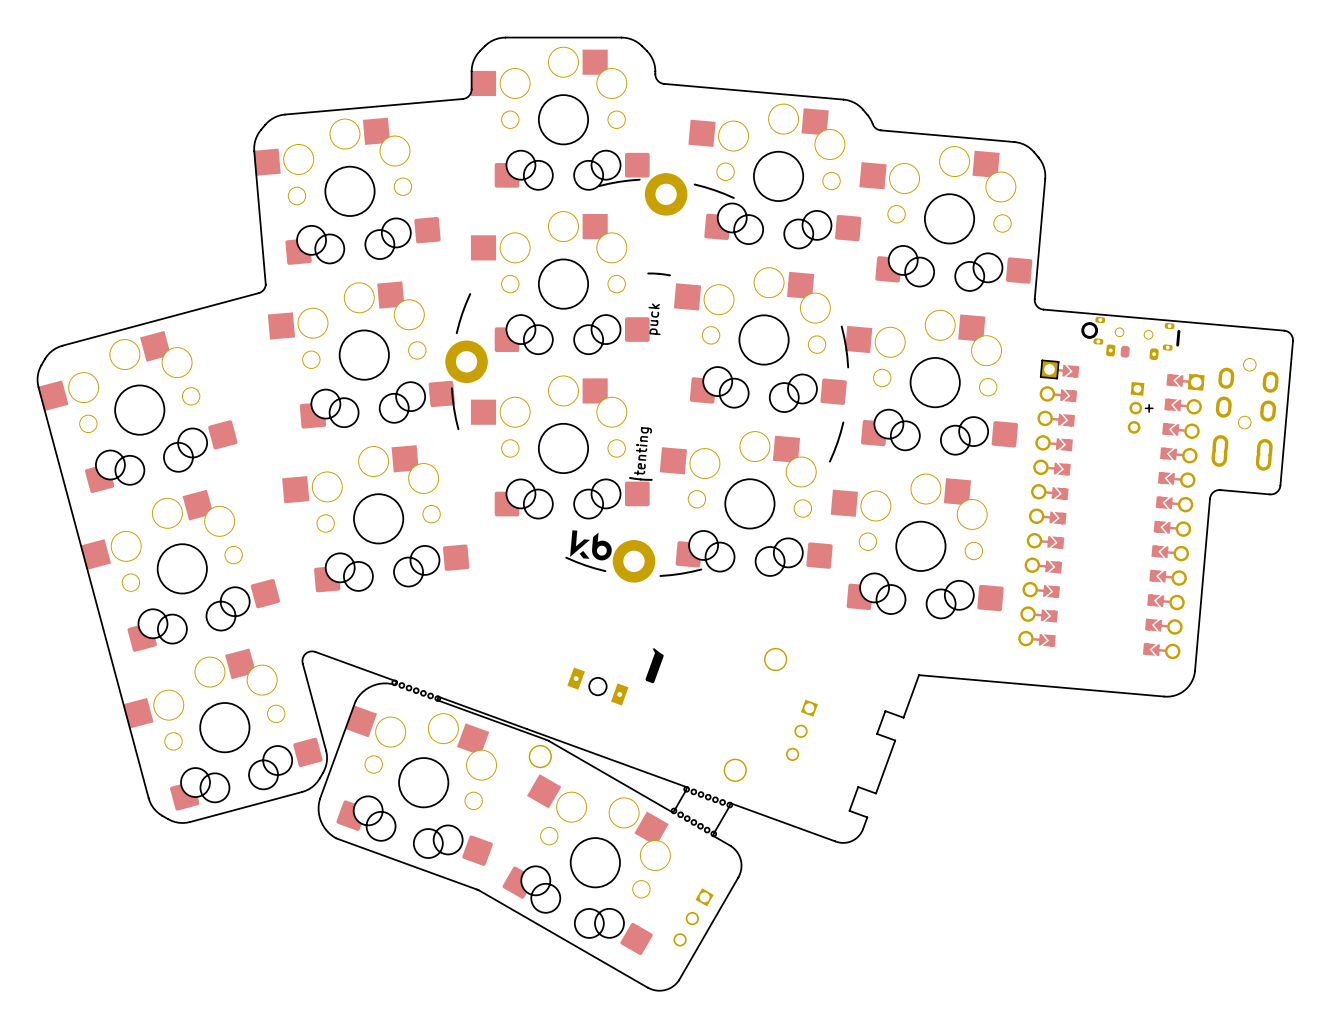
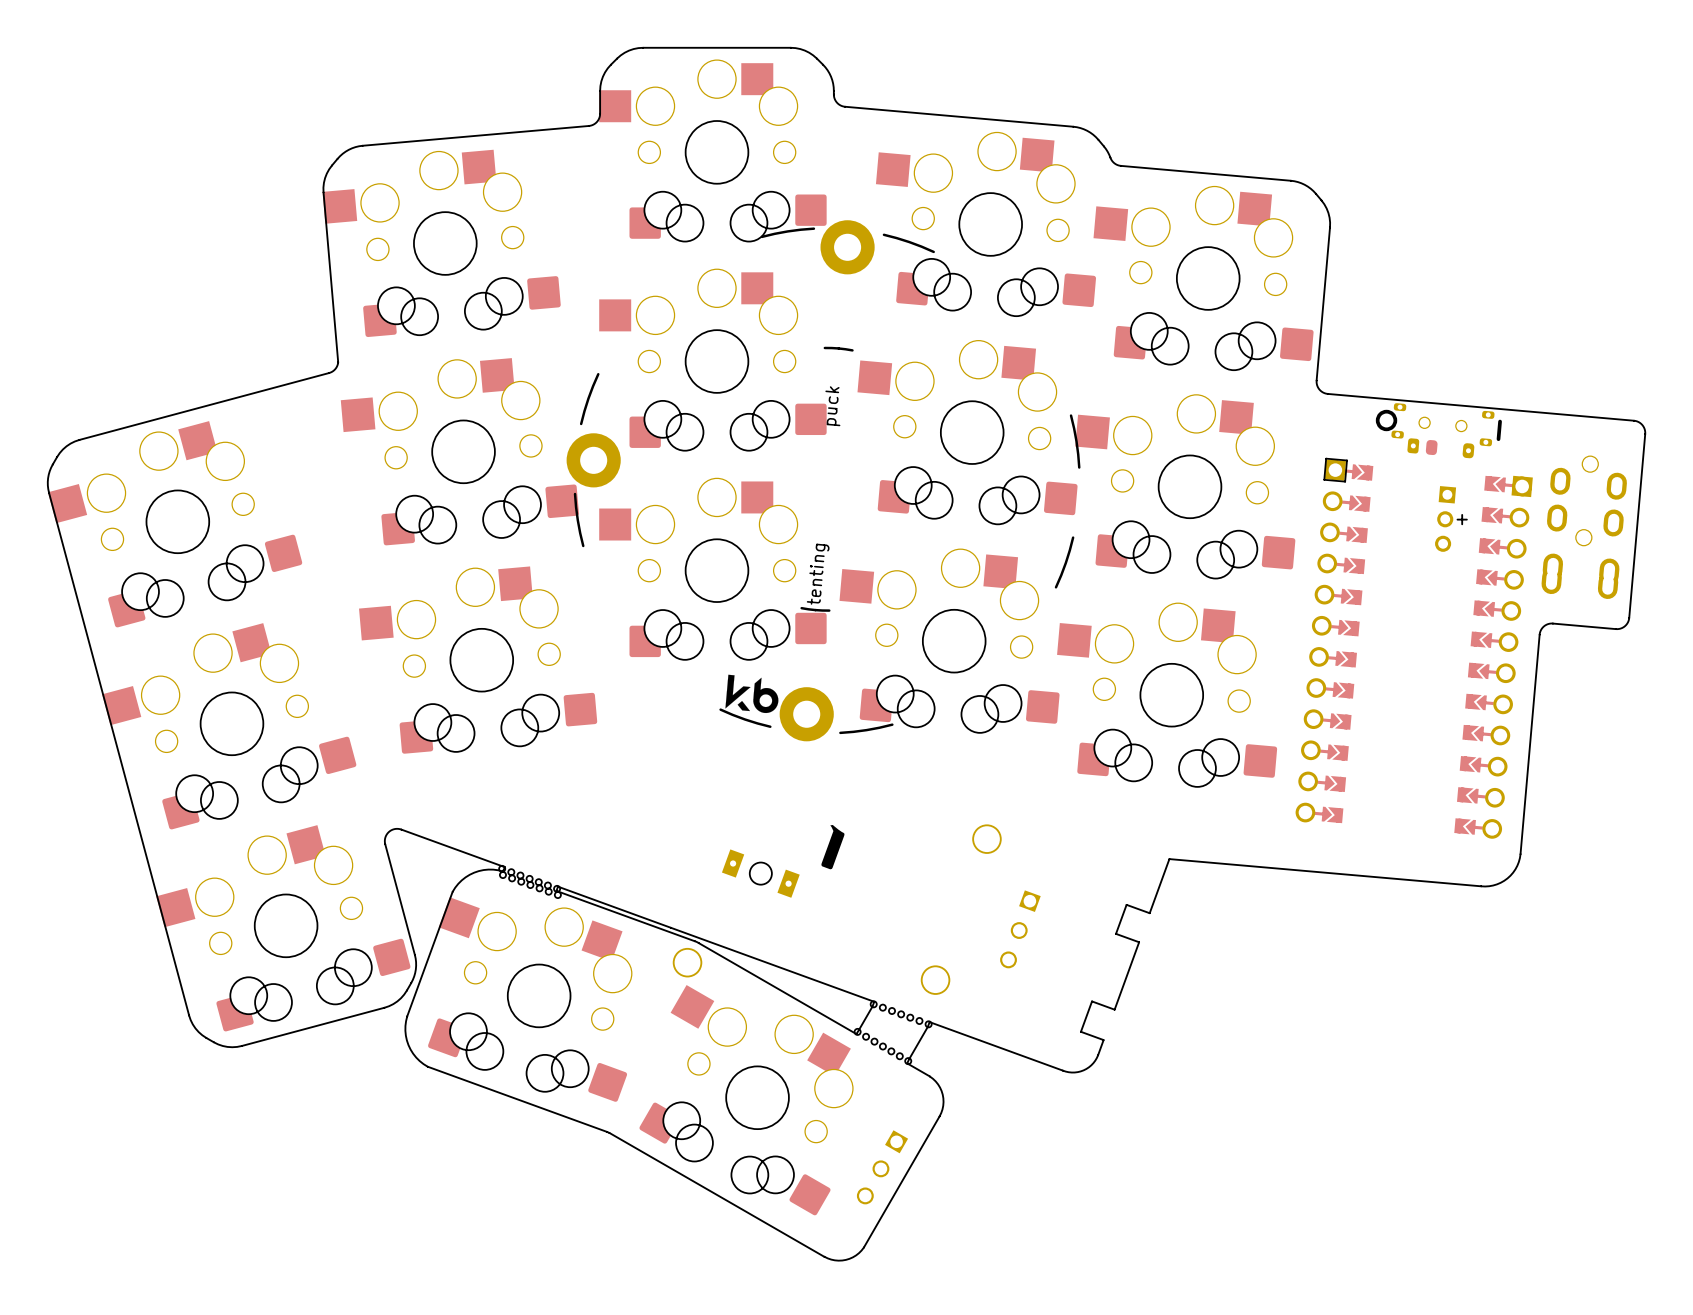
part: none -> (530, 885)

